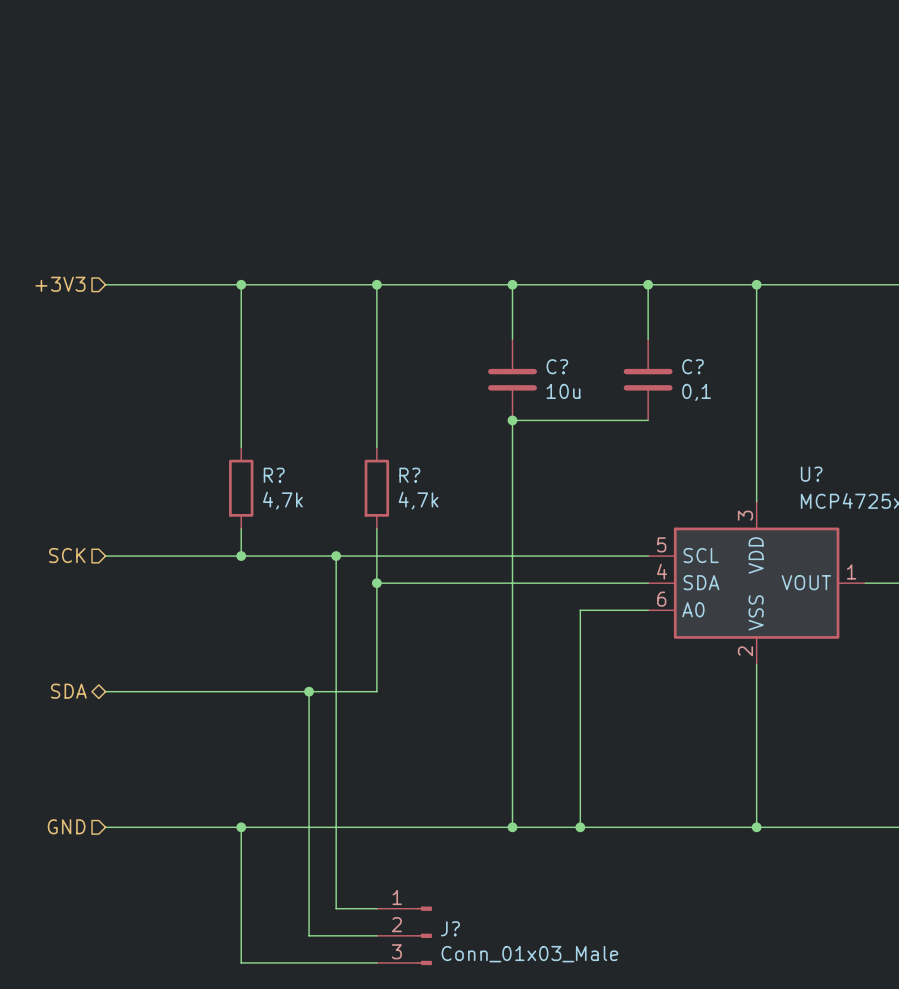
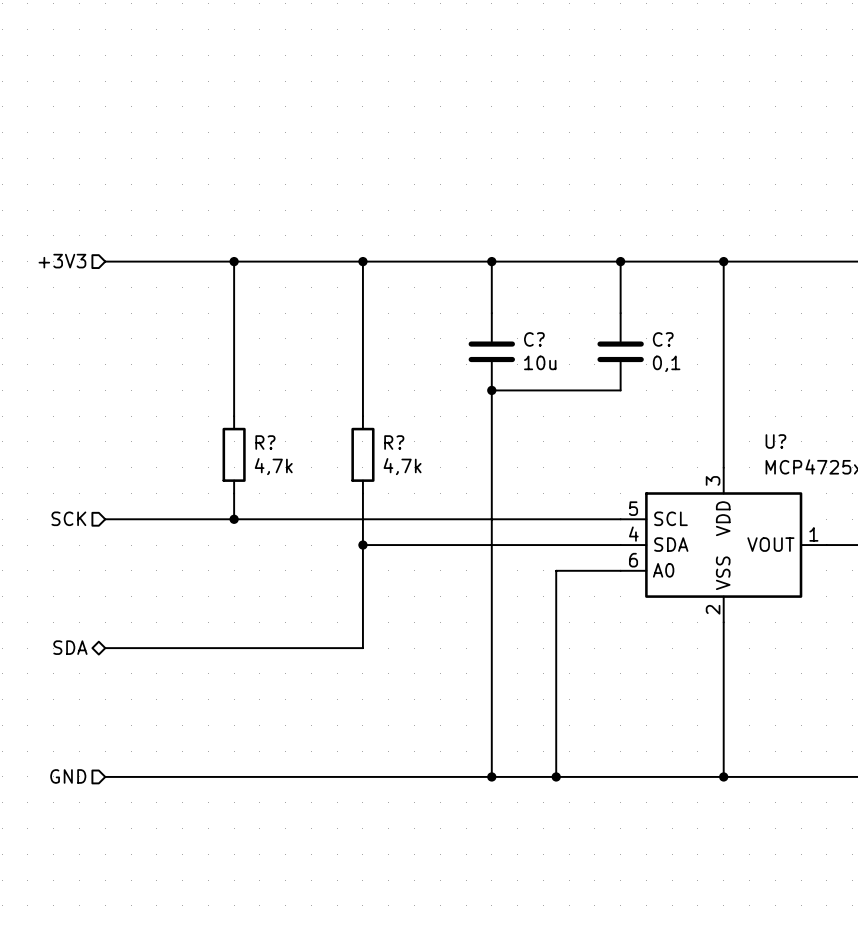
wire: (336, 556) (336, 908) (376, 908) -> none
junction: (336, 556) -> none
wire: (309, 691) (309, 935) (376, 935) -> none
junction: (309, 691) -> none
wire: (241, 827) (241, 962) (376, 962) -> none
junction: (241, 827) -> none
J?: Conn_01x03_Male (404, 935) -> none

